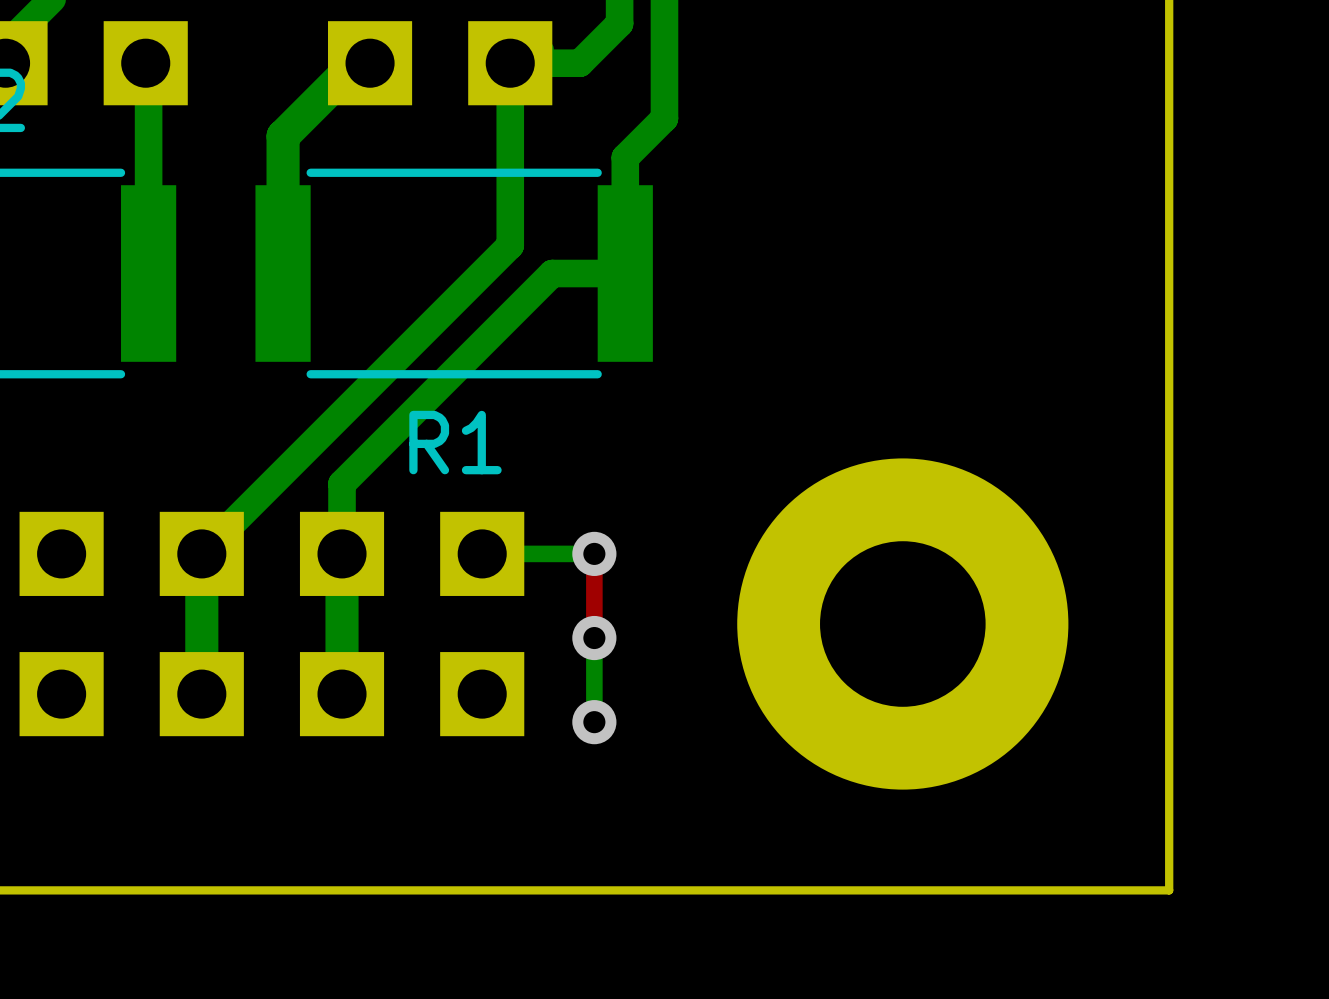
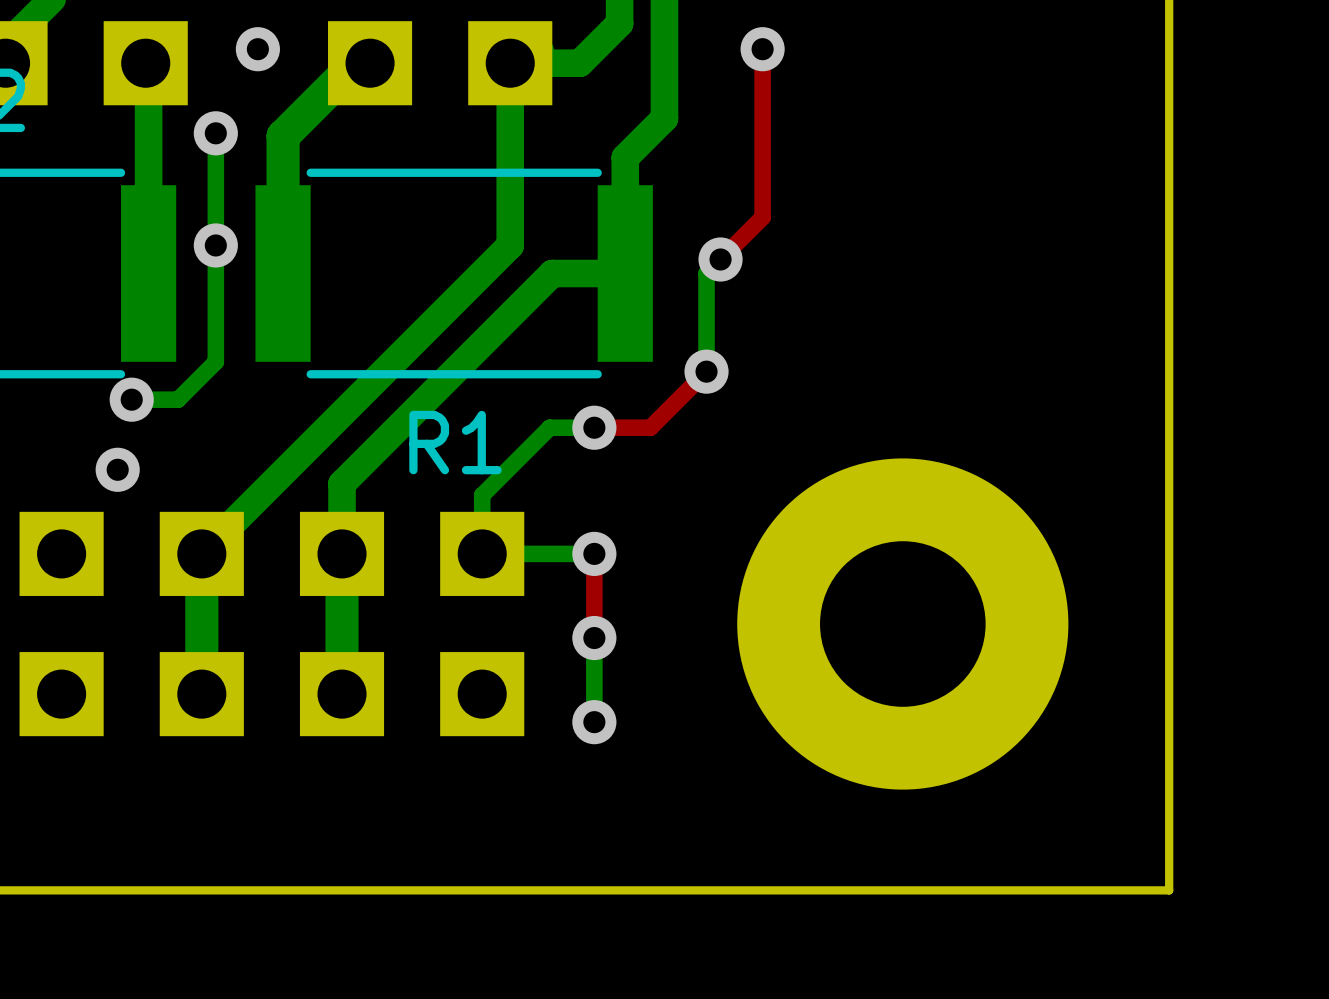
via: none -> (257, 49)
top track: none -> (762, 49) (762, 217) (720, 259)
via: none -> (762, 49)
bottom track: none -> (215, 133) (215, 361) (178, 399) (131, 399)
via: none -> (215, 133)
via: none -> (215, 245)
bottom track: none -> (720, 259) (706, 273) (706, 371)
via: none -> (720, 259)
top track: none -> (706, 371) (650, 427) (594, 427)
via: none -> (706, 371)
via: none -> (131, 399)
bottom track: none -> (594, 427) (549, 427) (482, 495) (482, 553)
via: none -> (594, 427)
via: none -> (117, 469)

